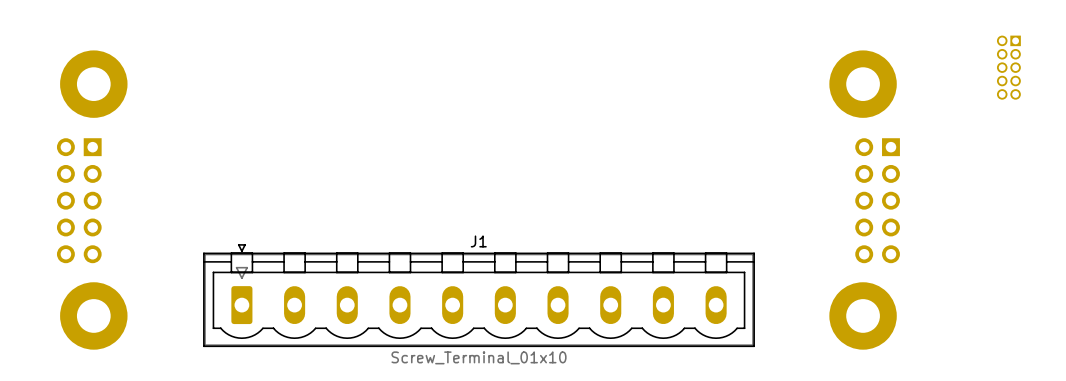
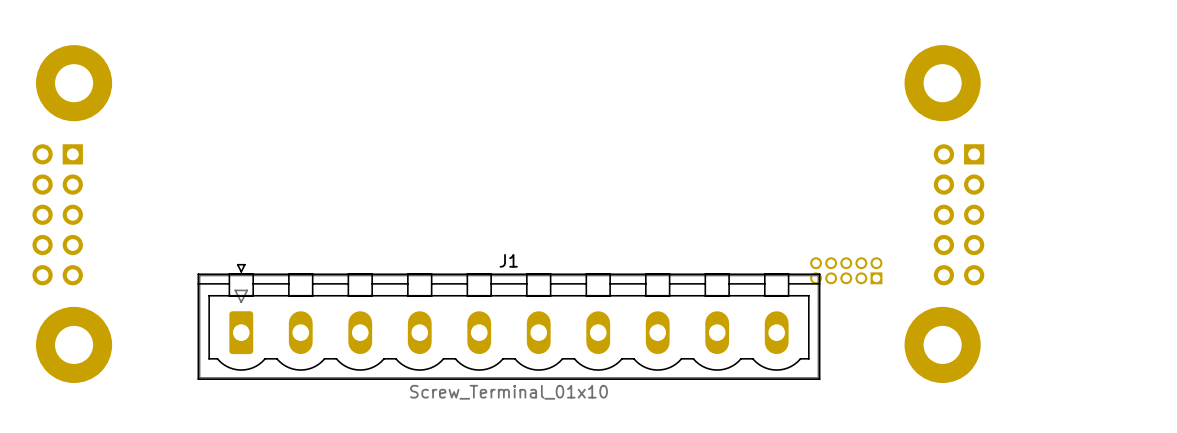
part: (1008, 67) -> none
part: none -> (846, 270)

